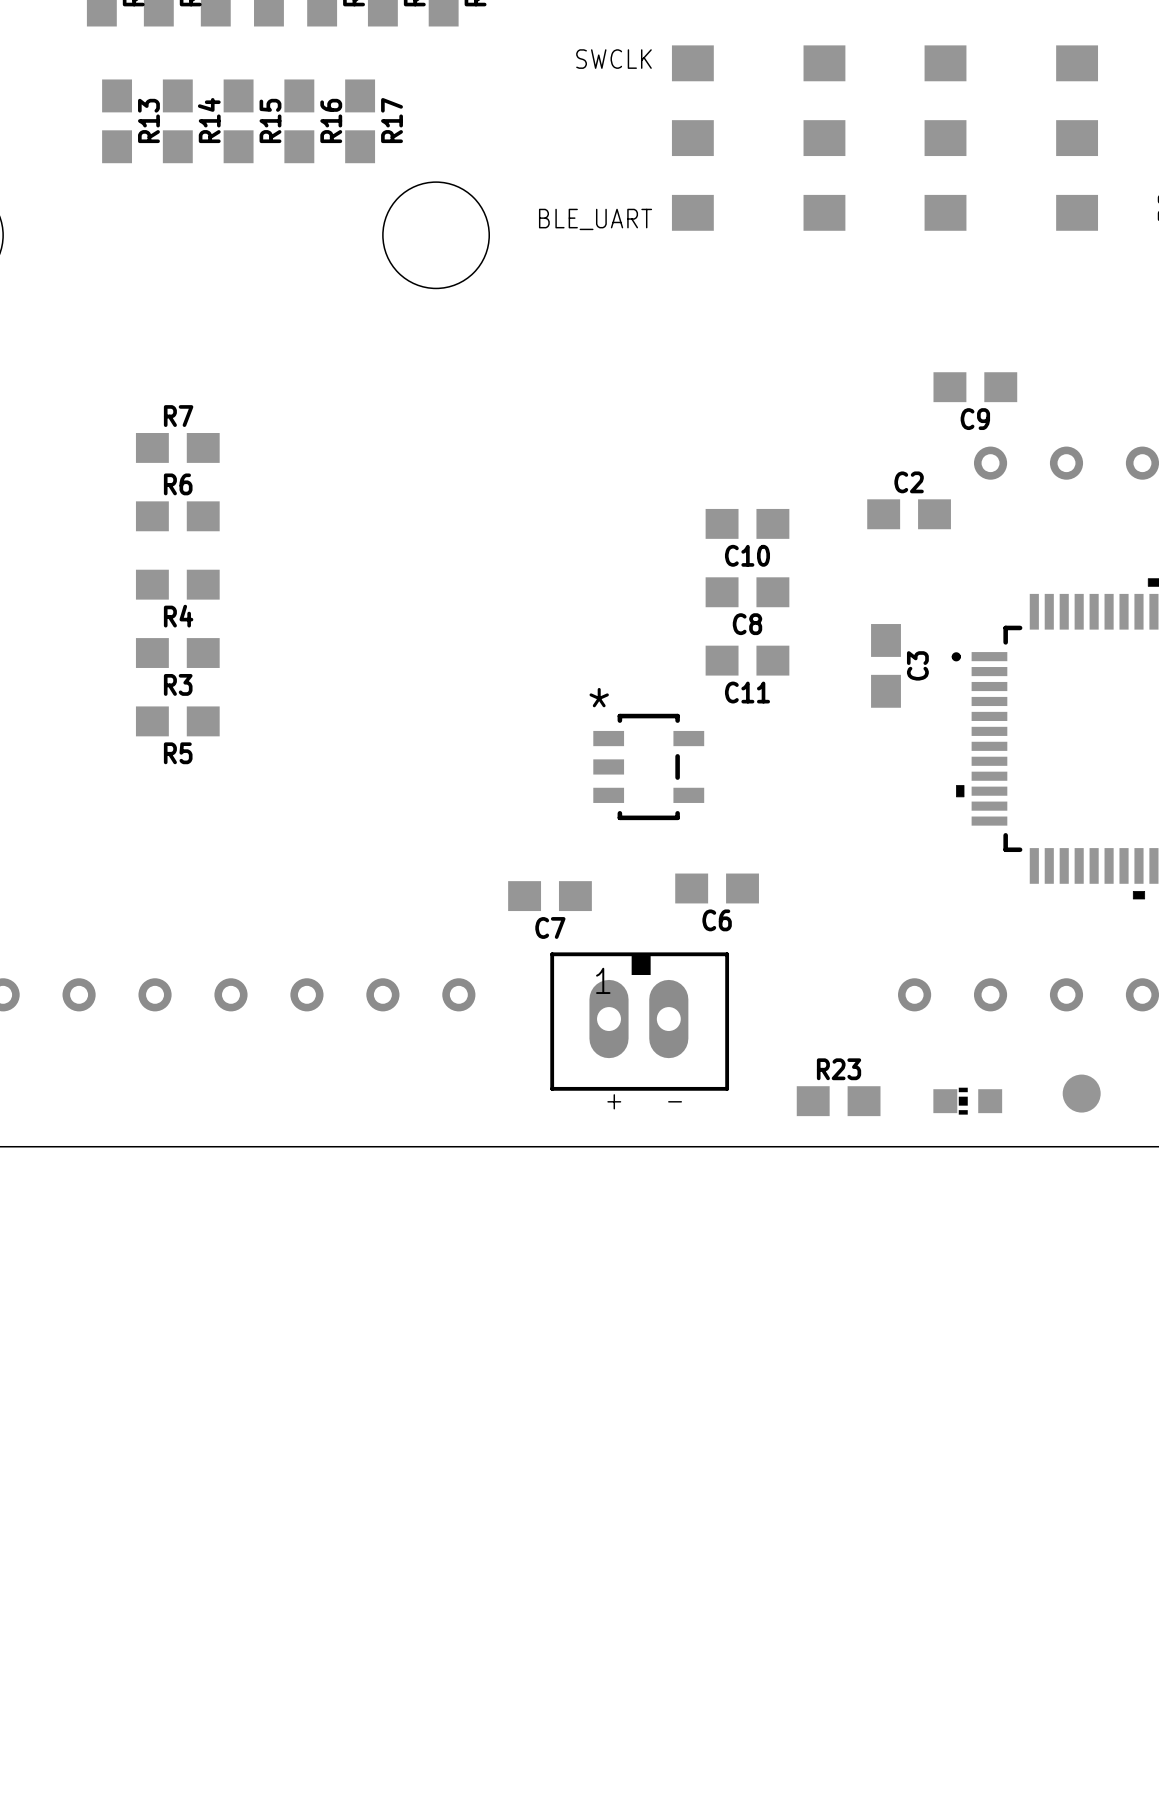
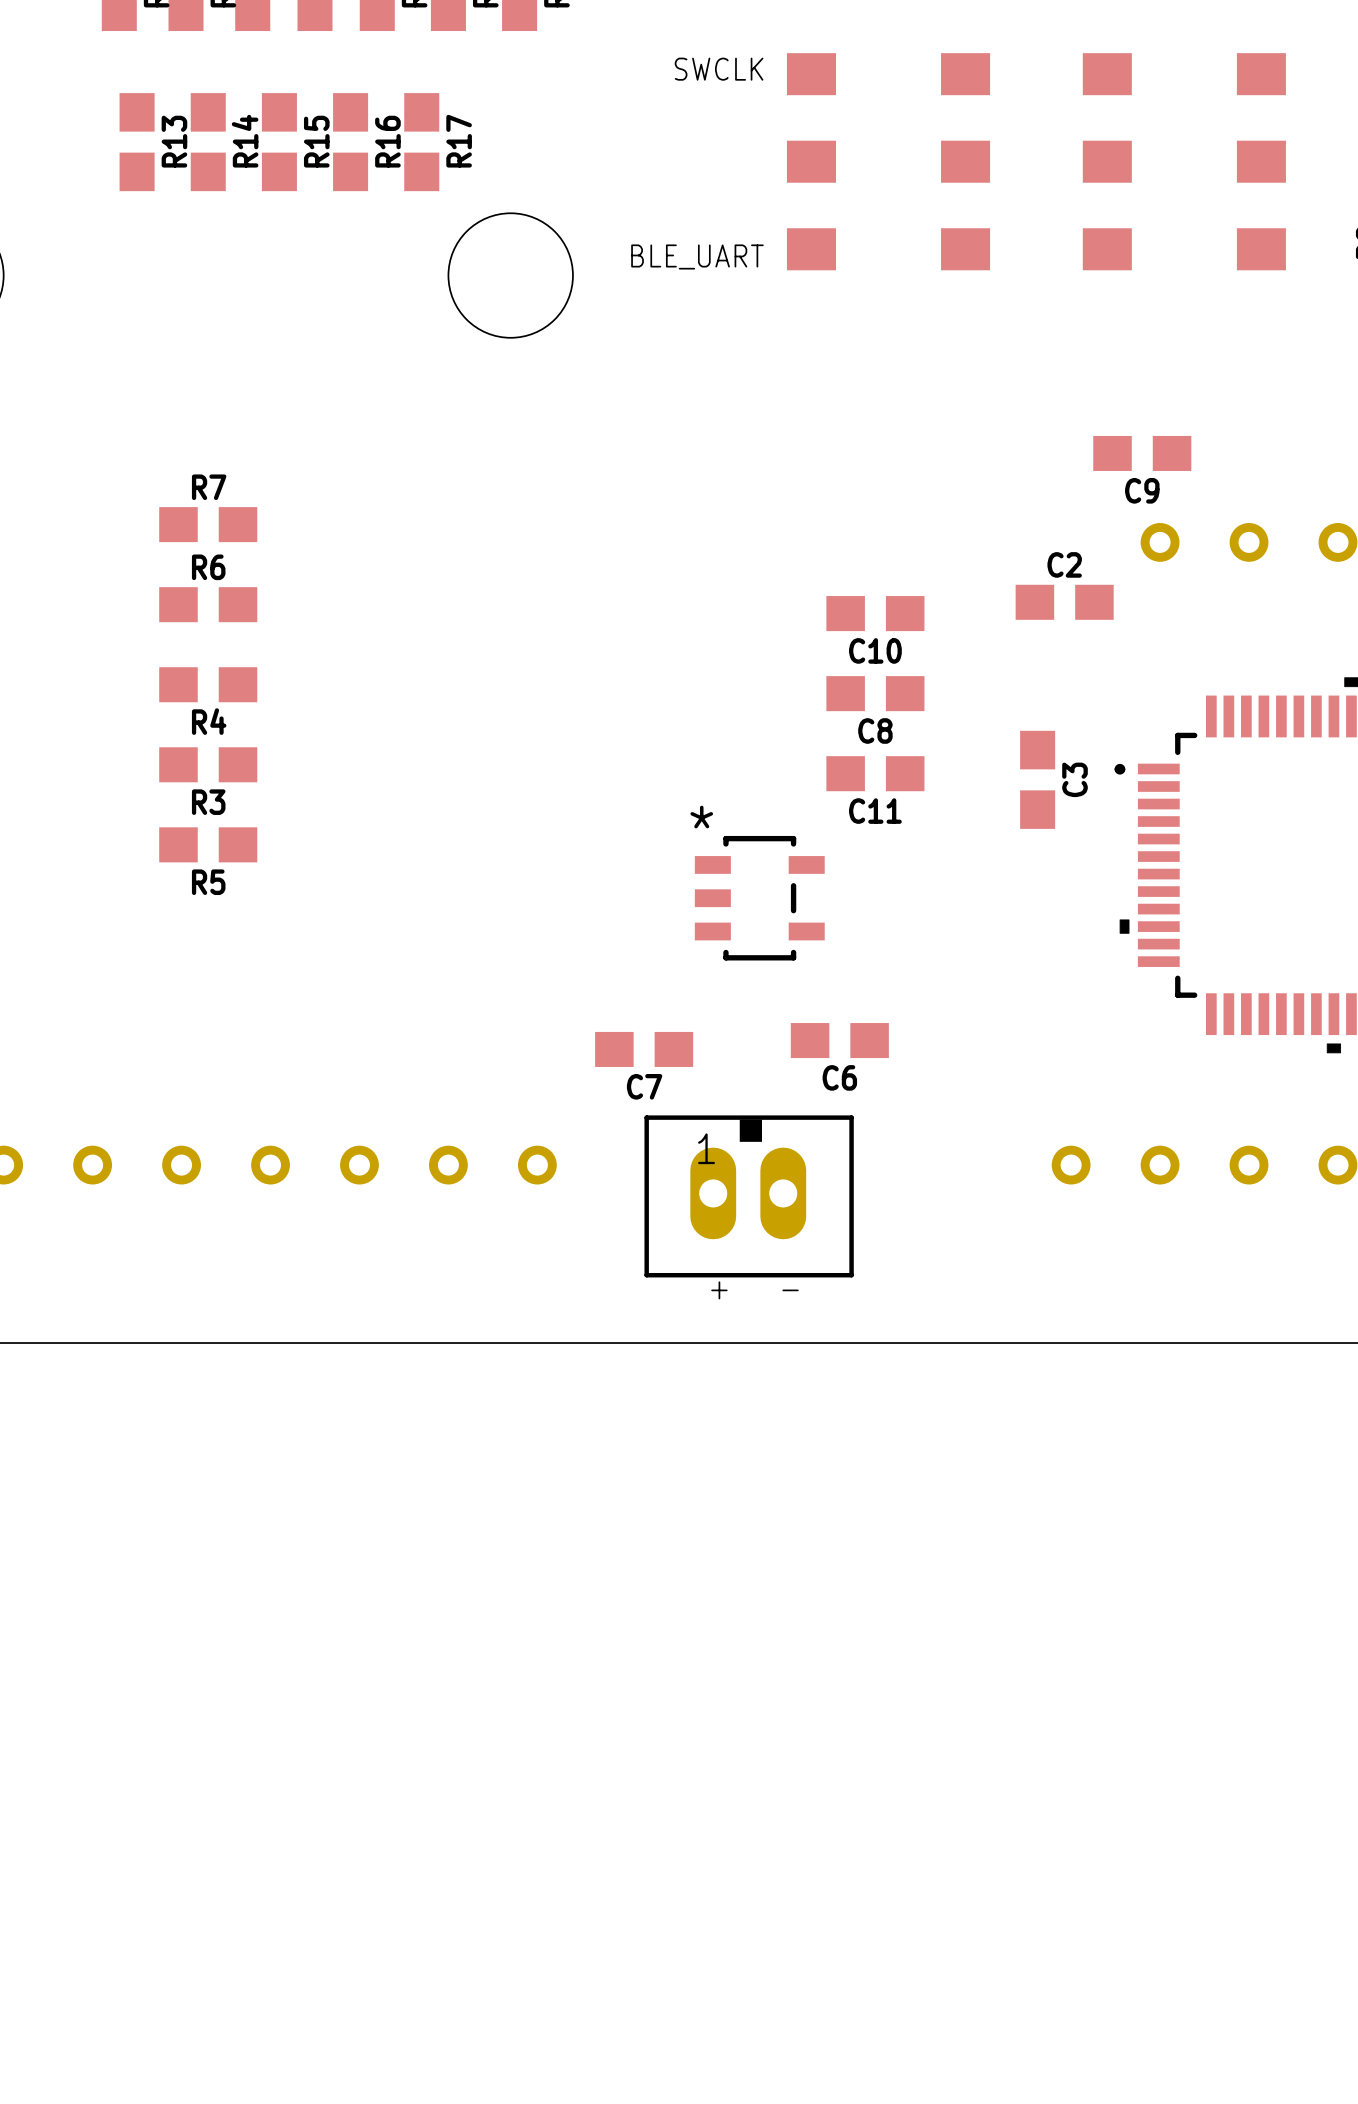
part: (1081, 1093) -> none
R23: (838, 1101) -> none
part: (967, 1101) -> none

